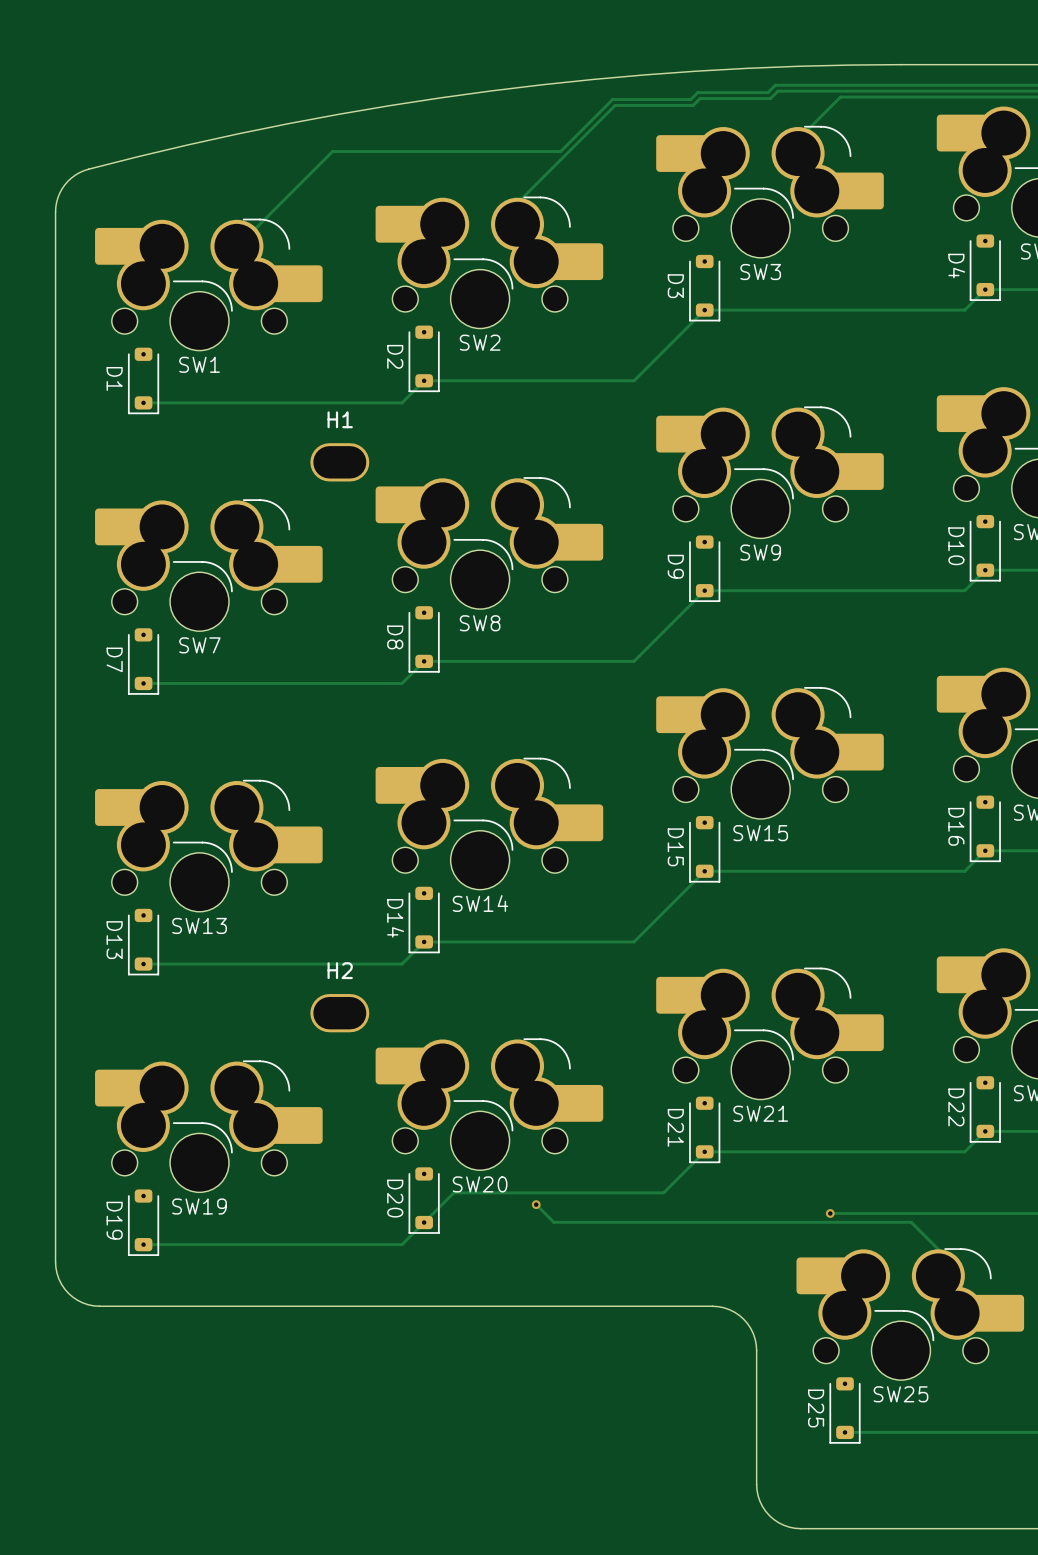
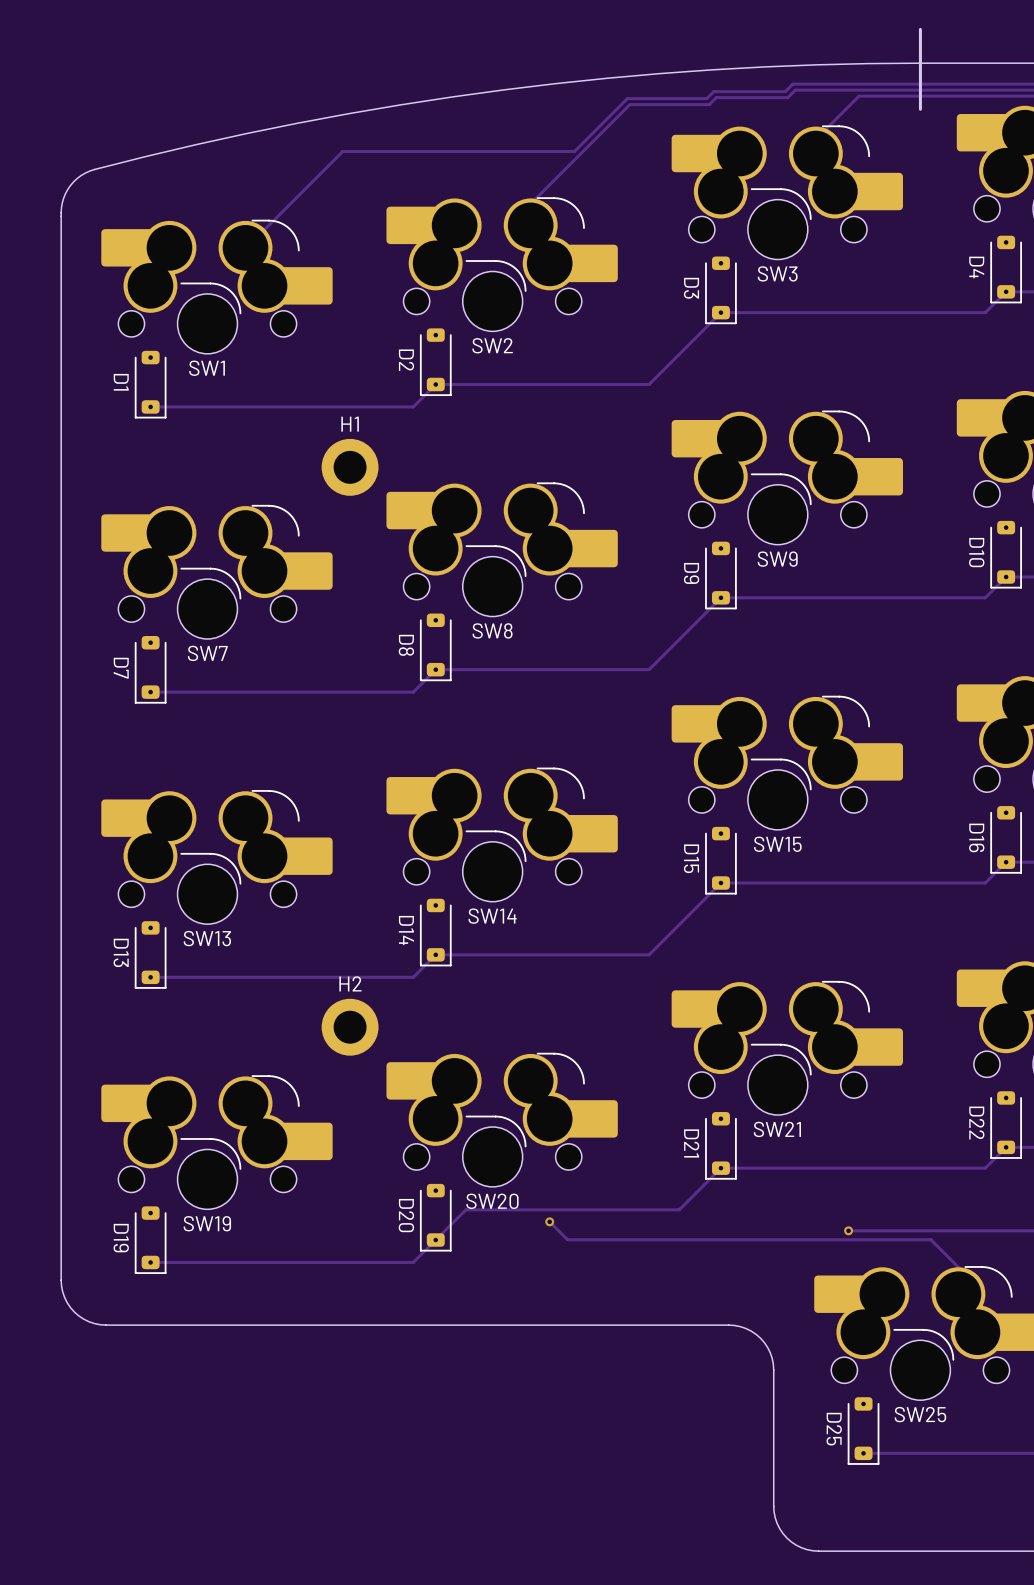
board edge: none -> (920, 29) (920, 109)
H1 footprint: [310, 443, 370, 482] -> [321, 438, 379, 496]
H2 footprint: [310, 994, 370, 1033] -> [321, 998, 379, 1056]

